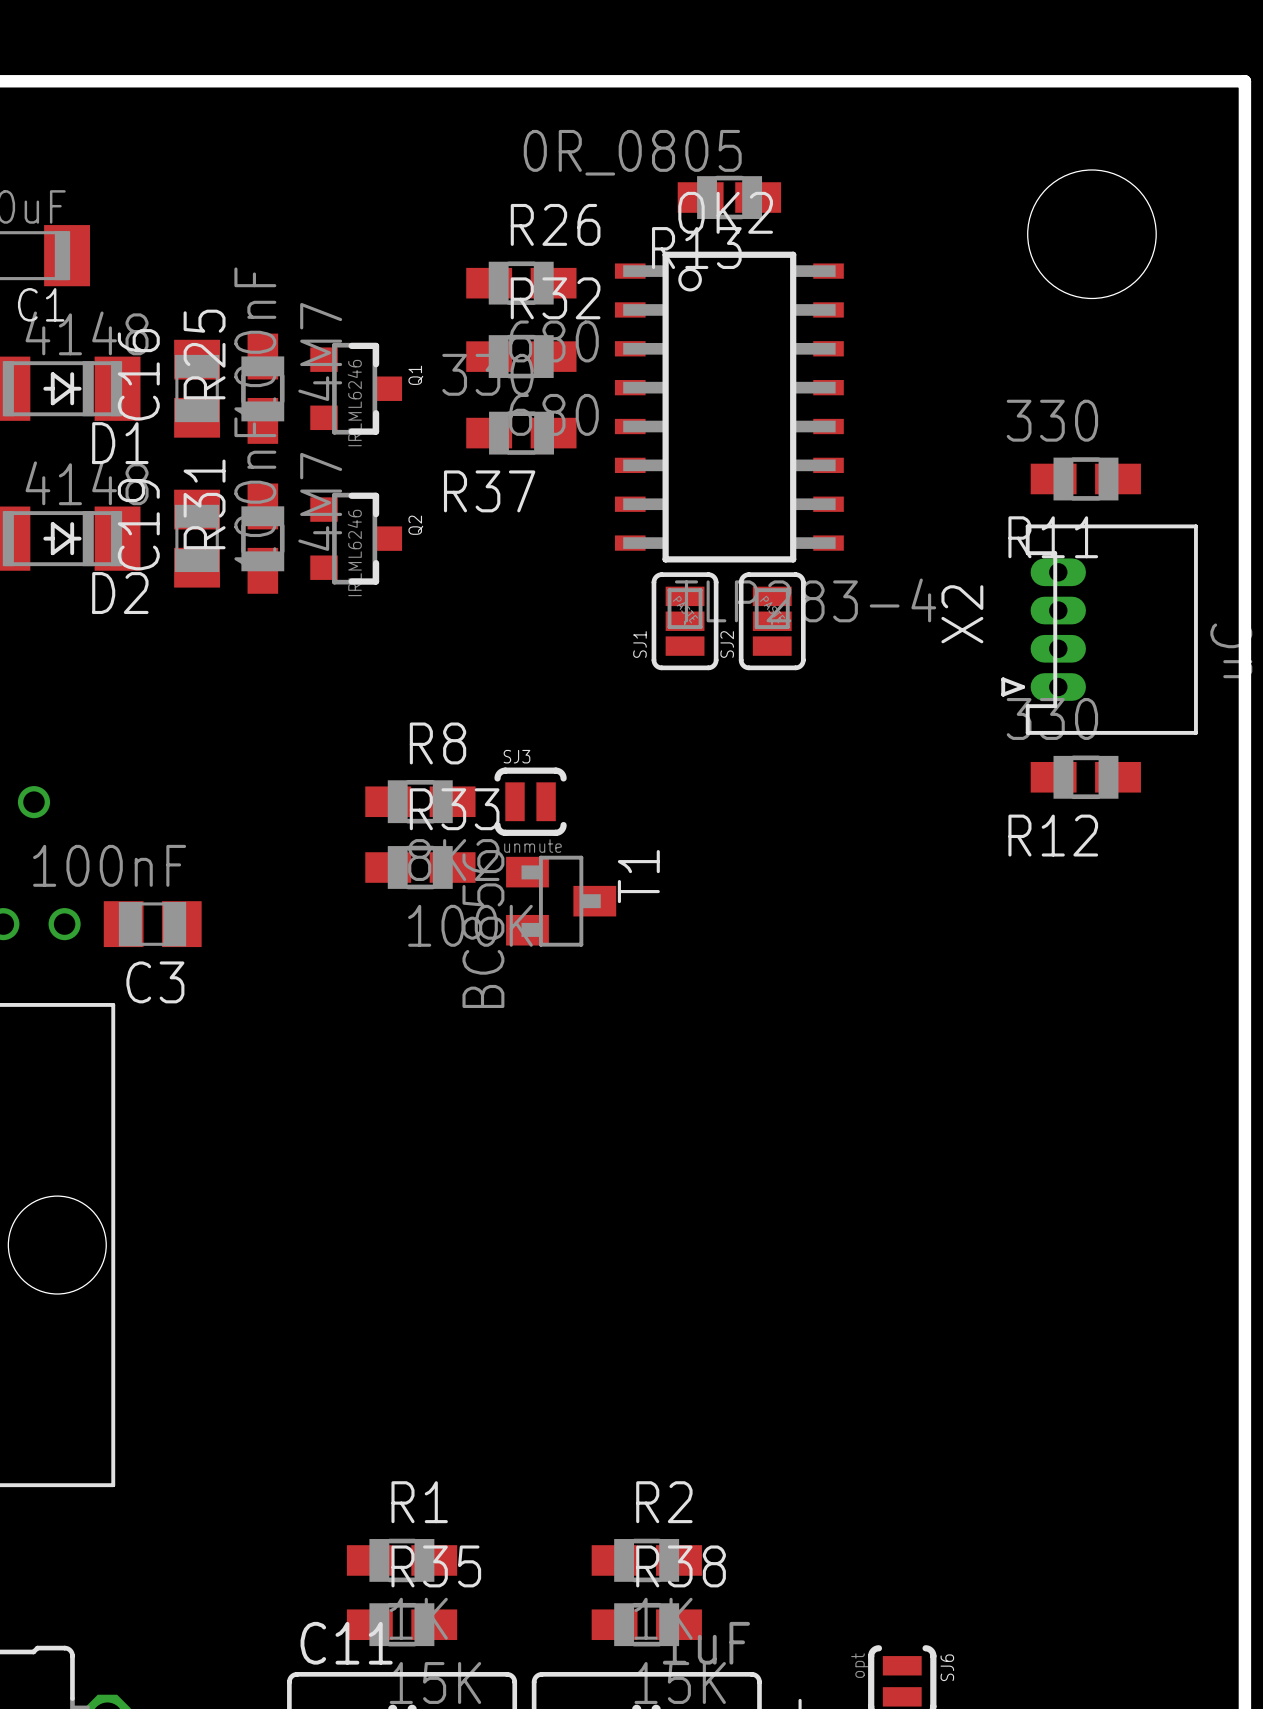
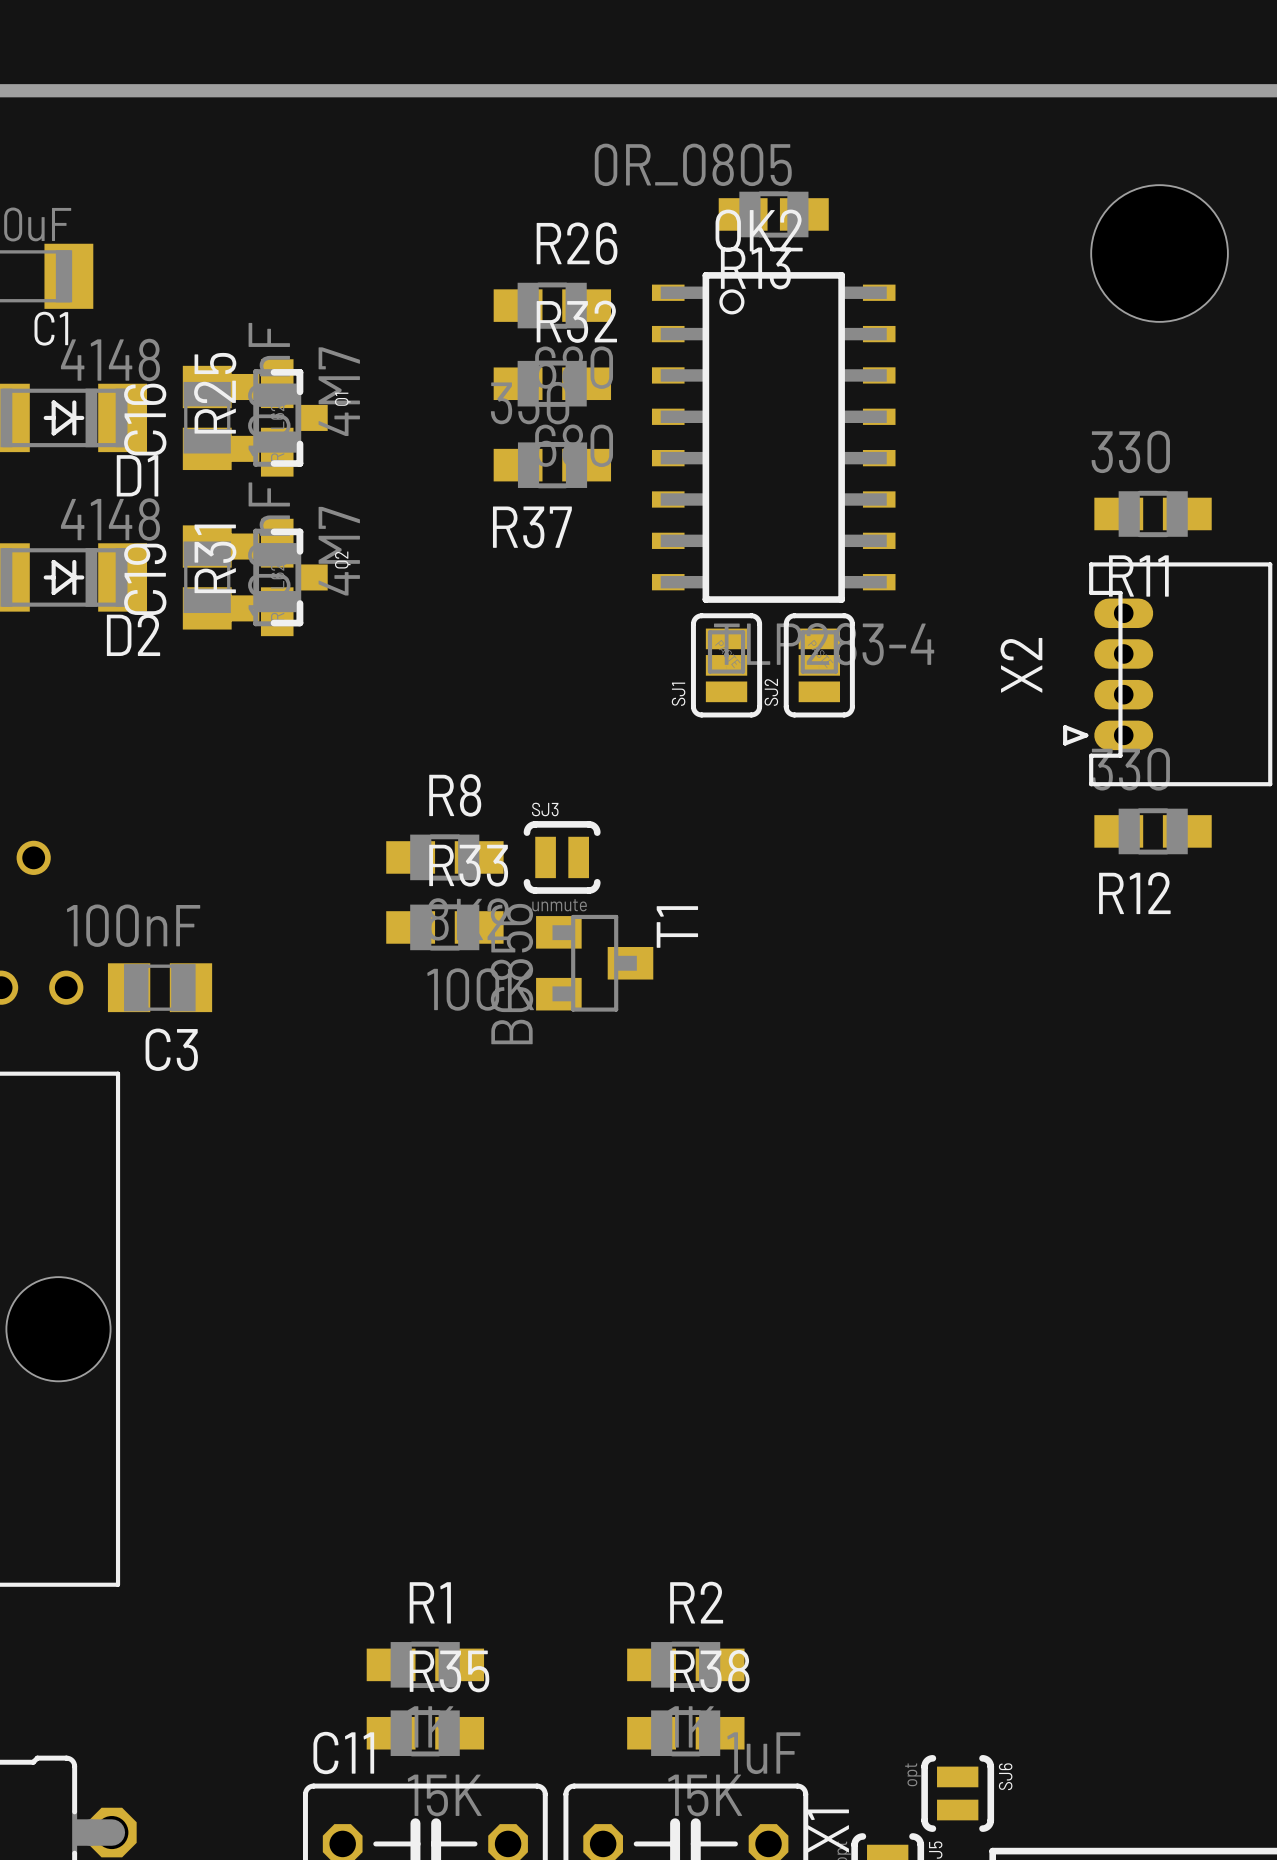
Q1 position: (356, 388) -> (278, 417)
Q2 position: (356, 538) -> (278, 577)

